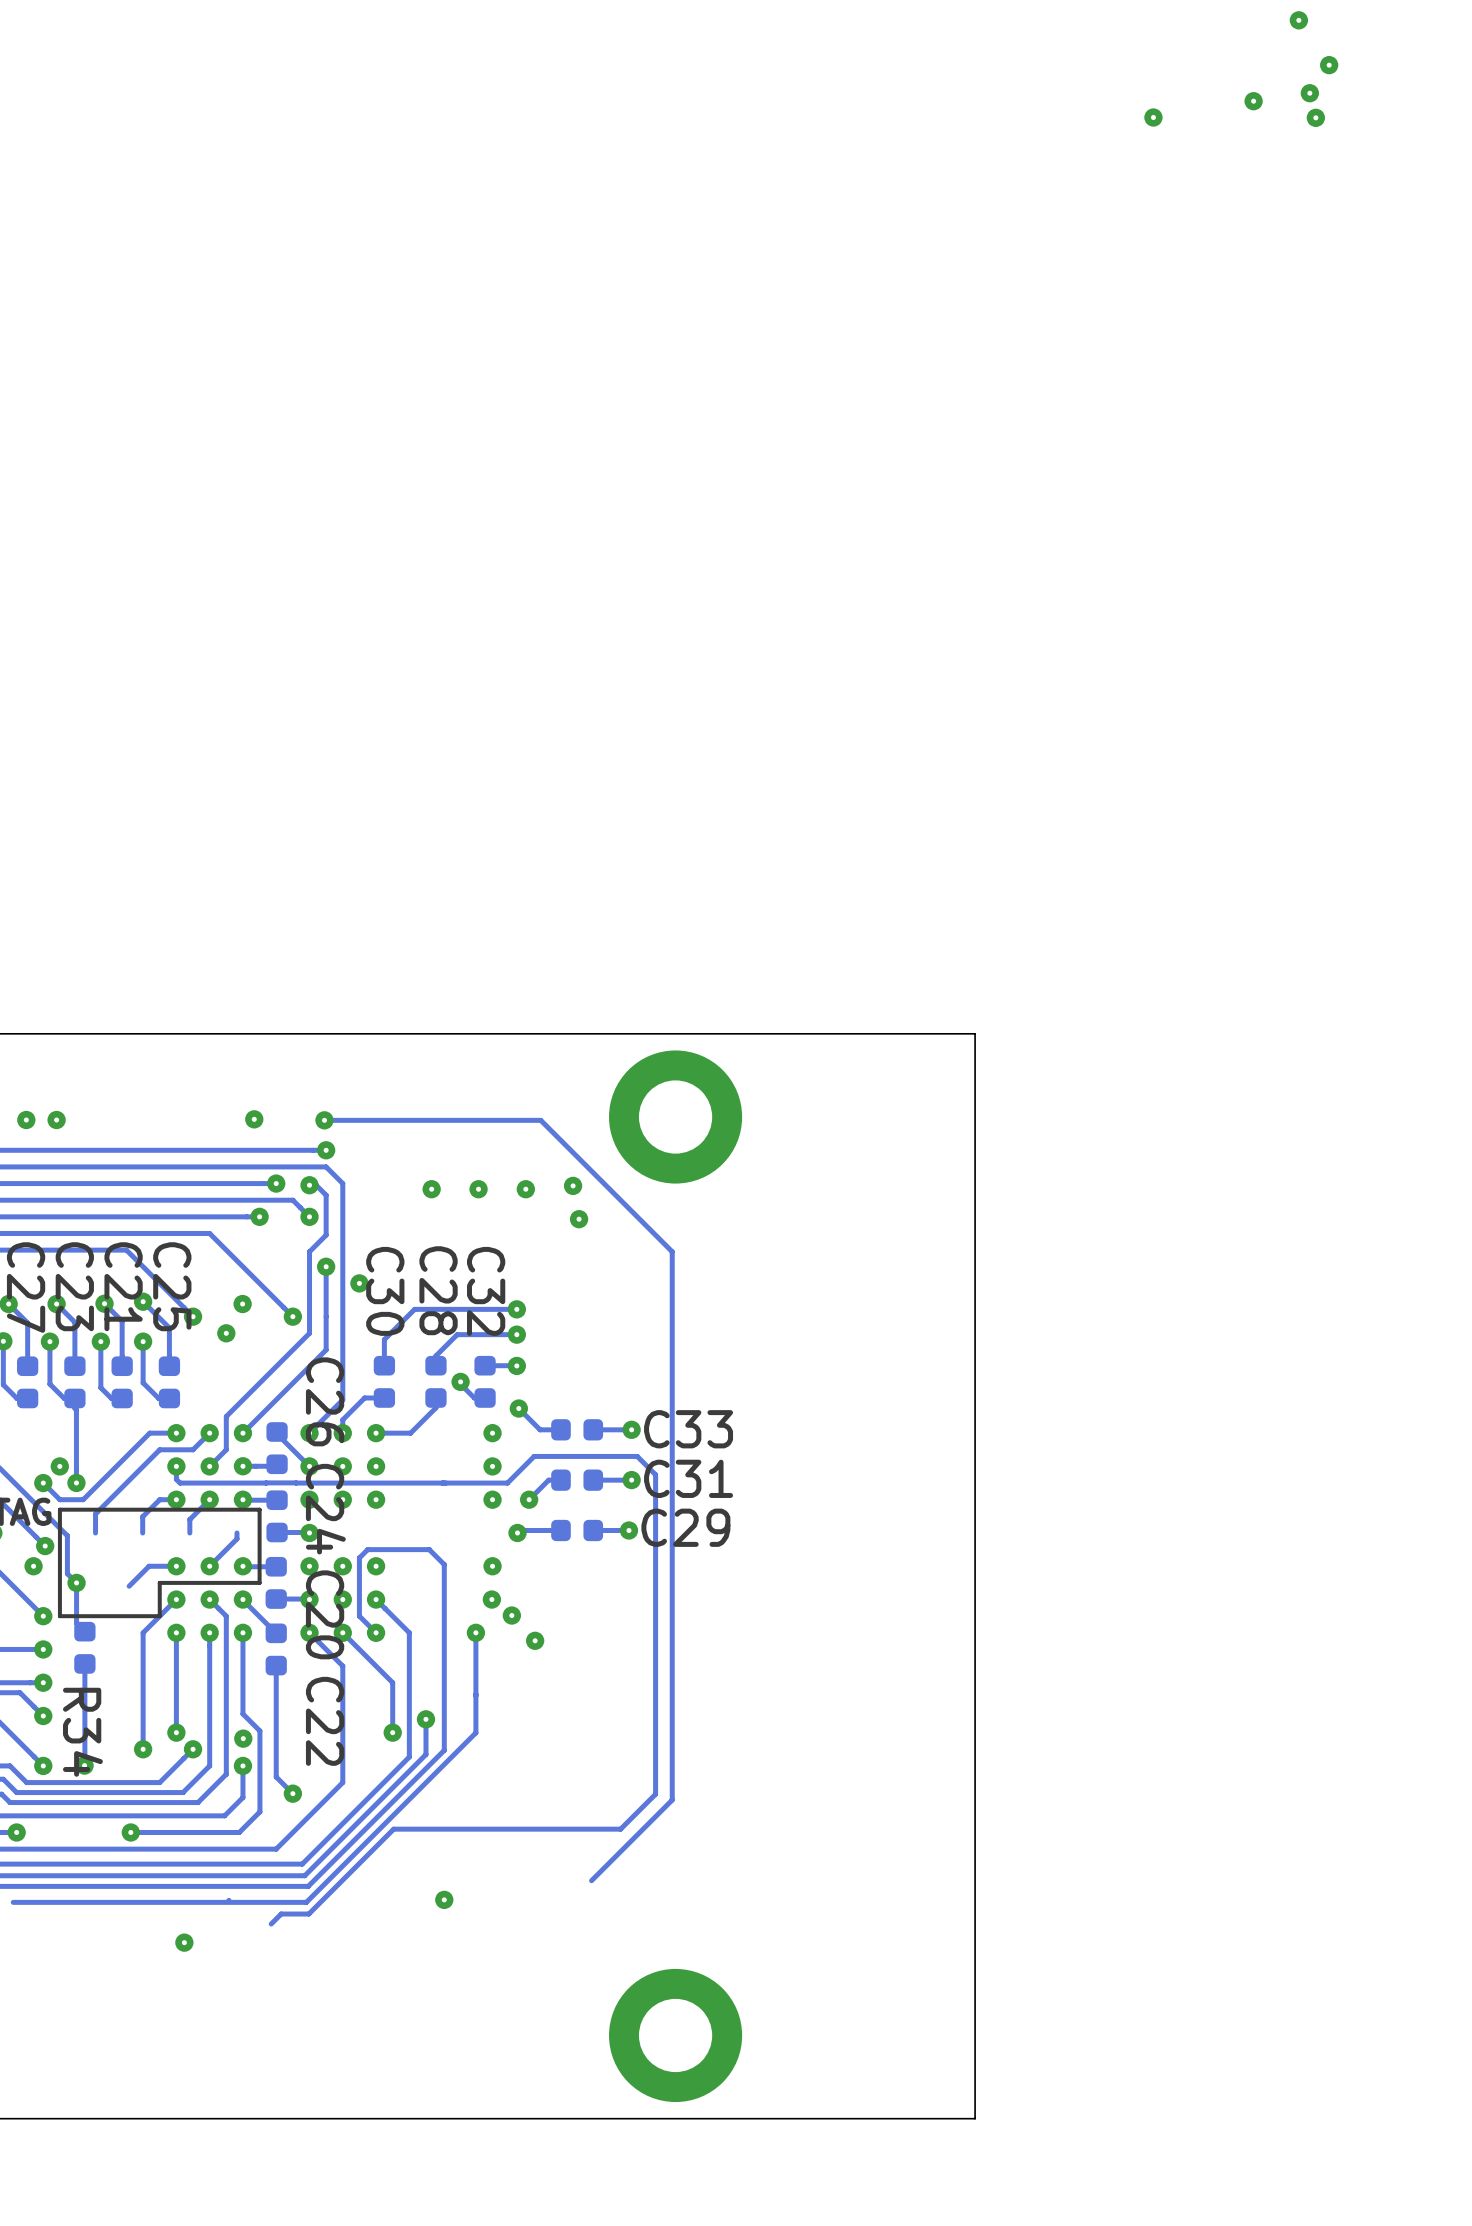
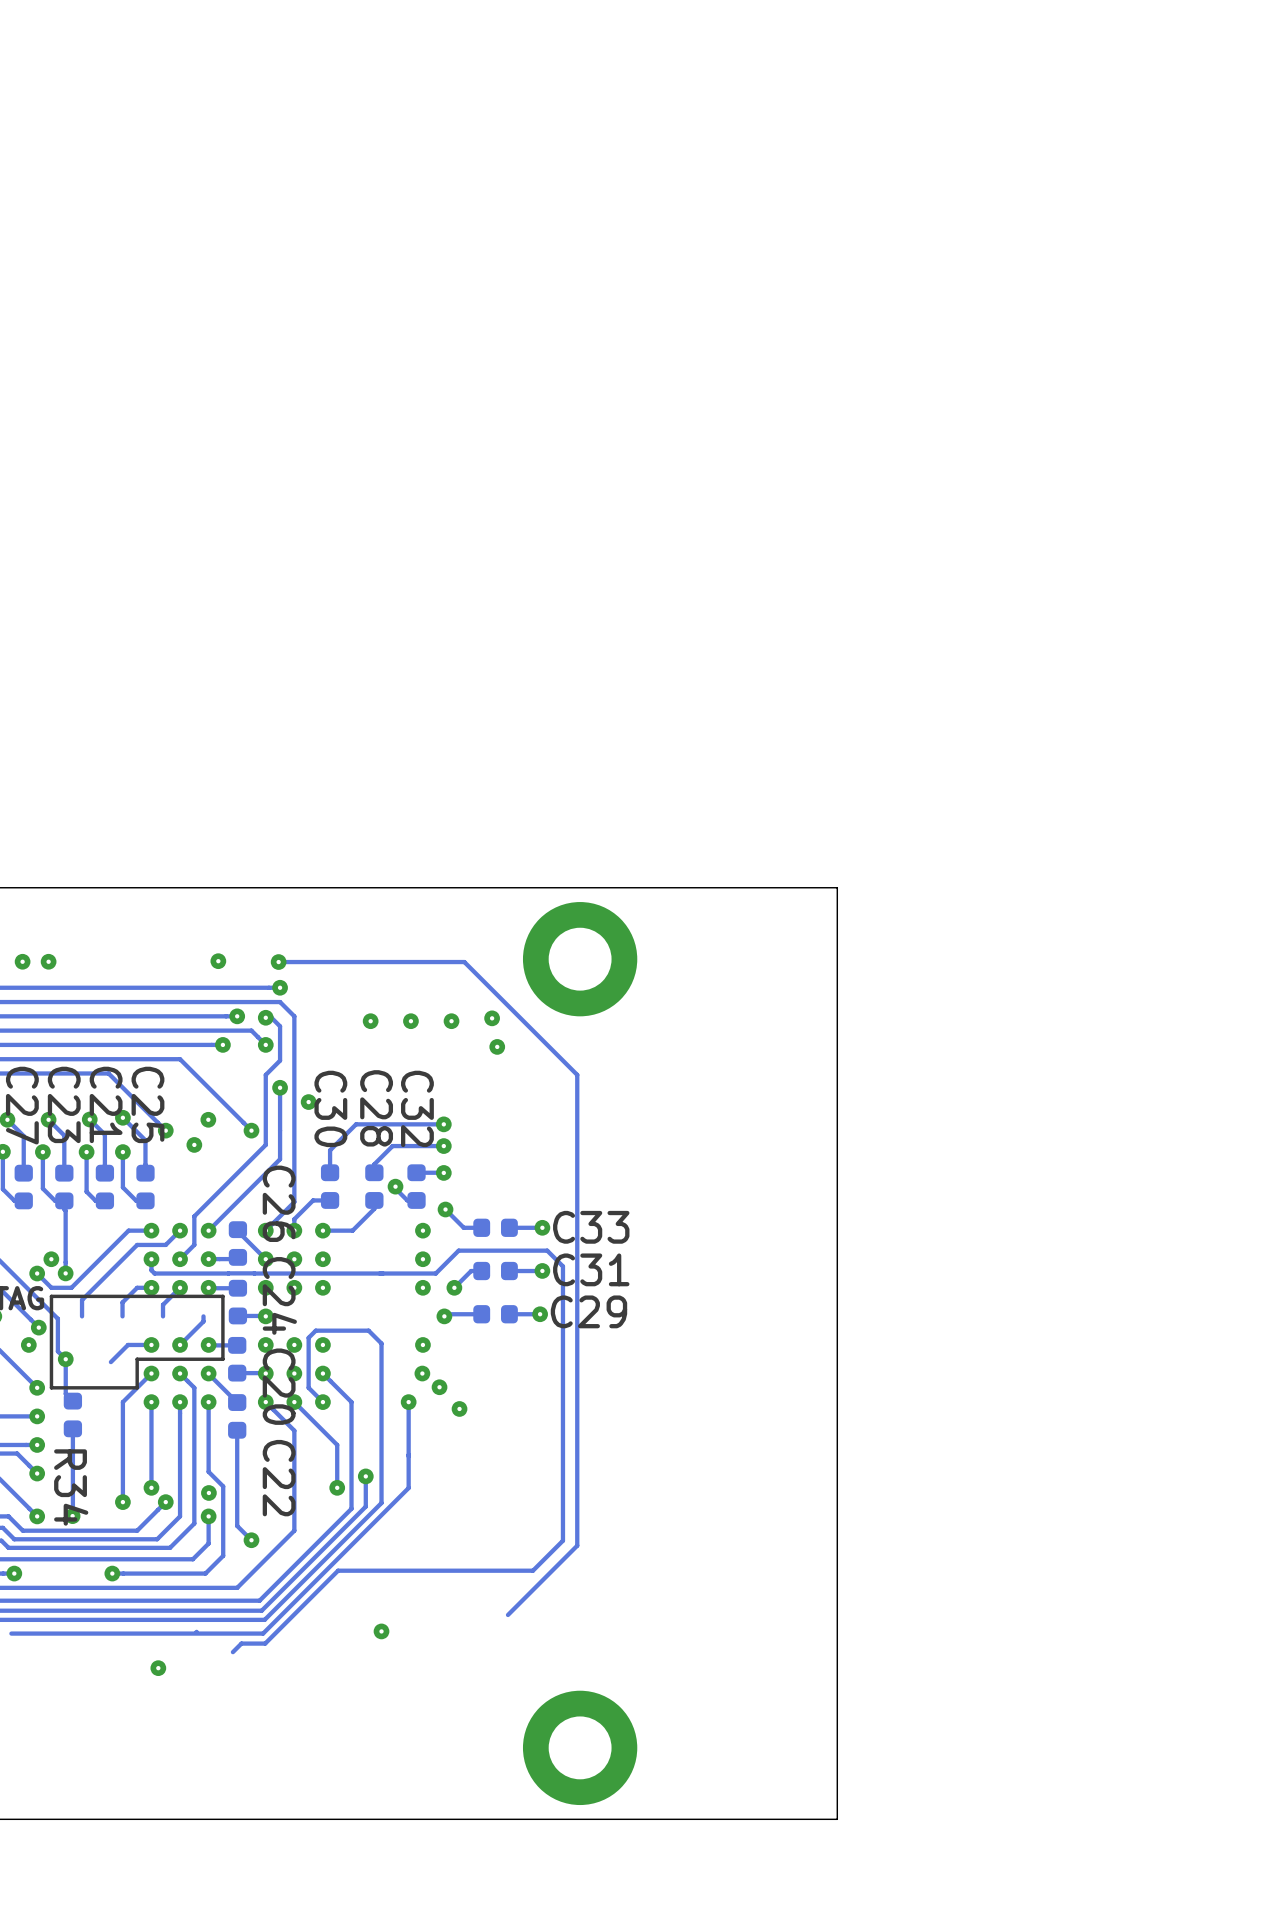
via: (1298, 20) -> none
via: (1329, 65) -> none
via: (1309, 93) -> none
via: (1253, 101) -> none
via: (1153, 117) -> none
via: (1315, 117) -> none

